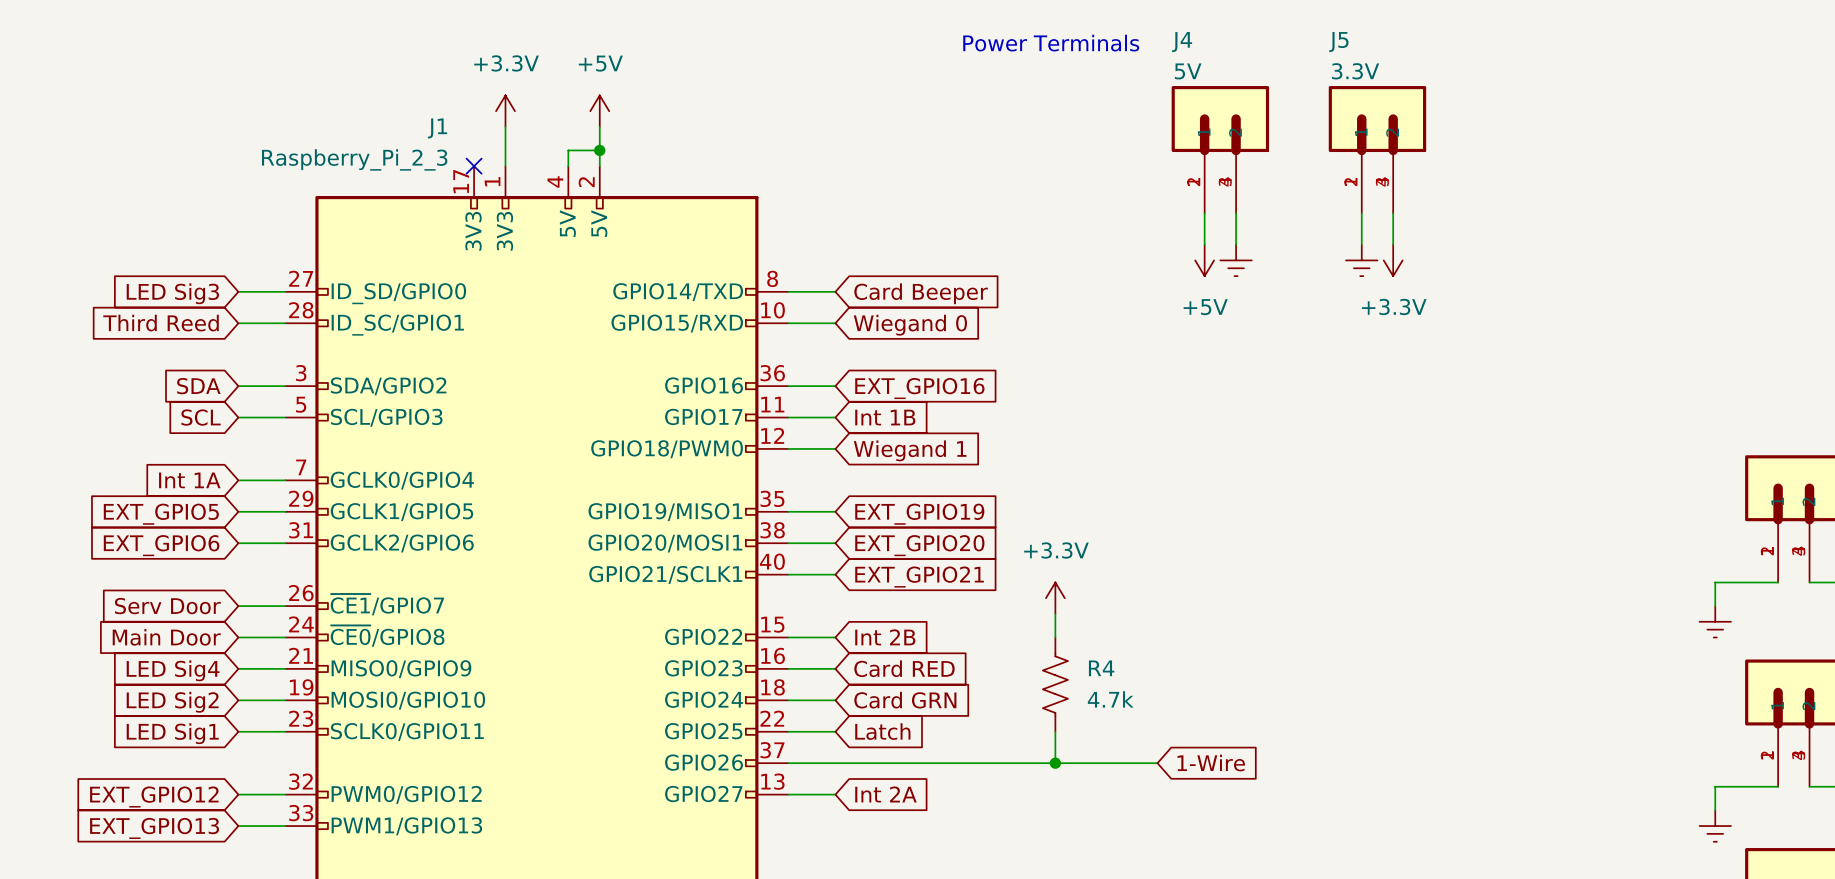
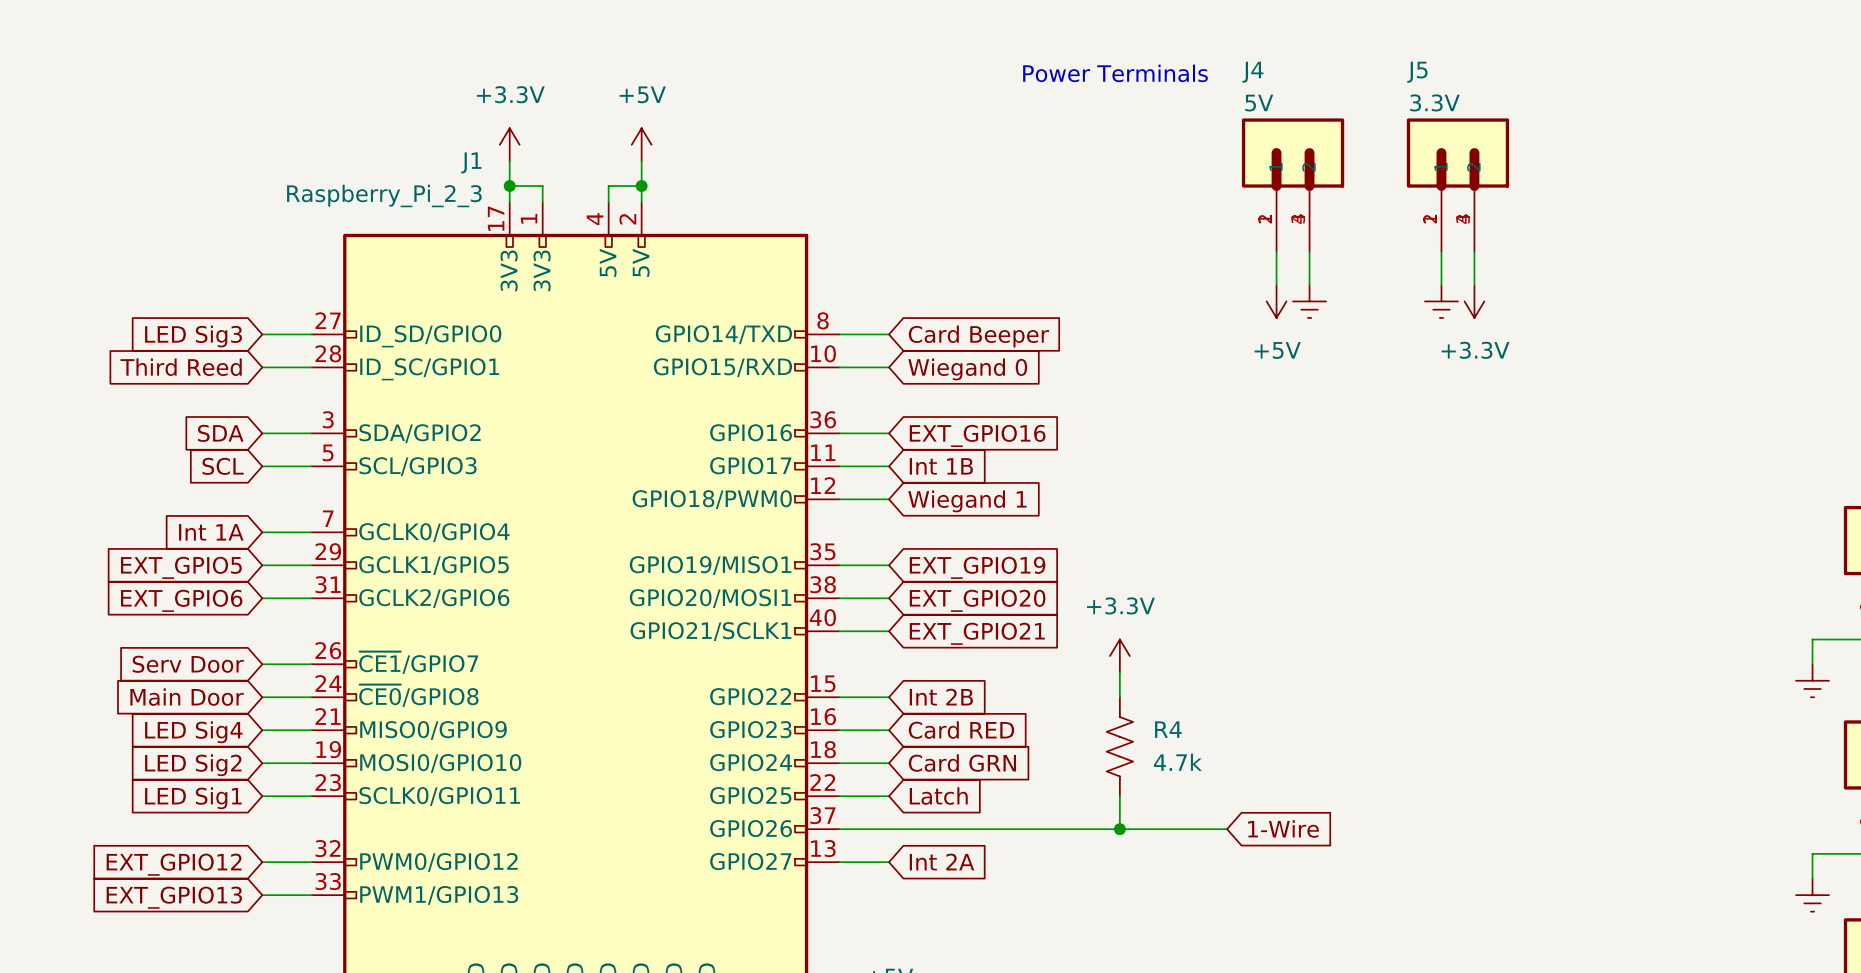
power symbol position: +3.3V (505, 111) -> +3.3V (509, 144)
wire: none -> (509, 161) (509, 202)
wire: (505, 126) (505, 150) -> (509, 186) (542, 186)
junction: none -> (509, 186)
no-connect mark: (474, 166) -> none

